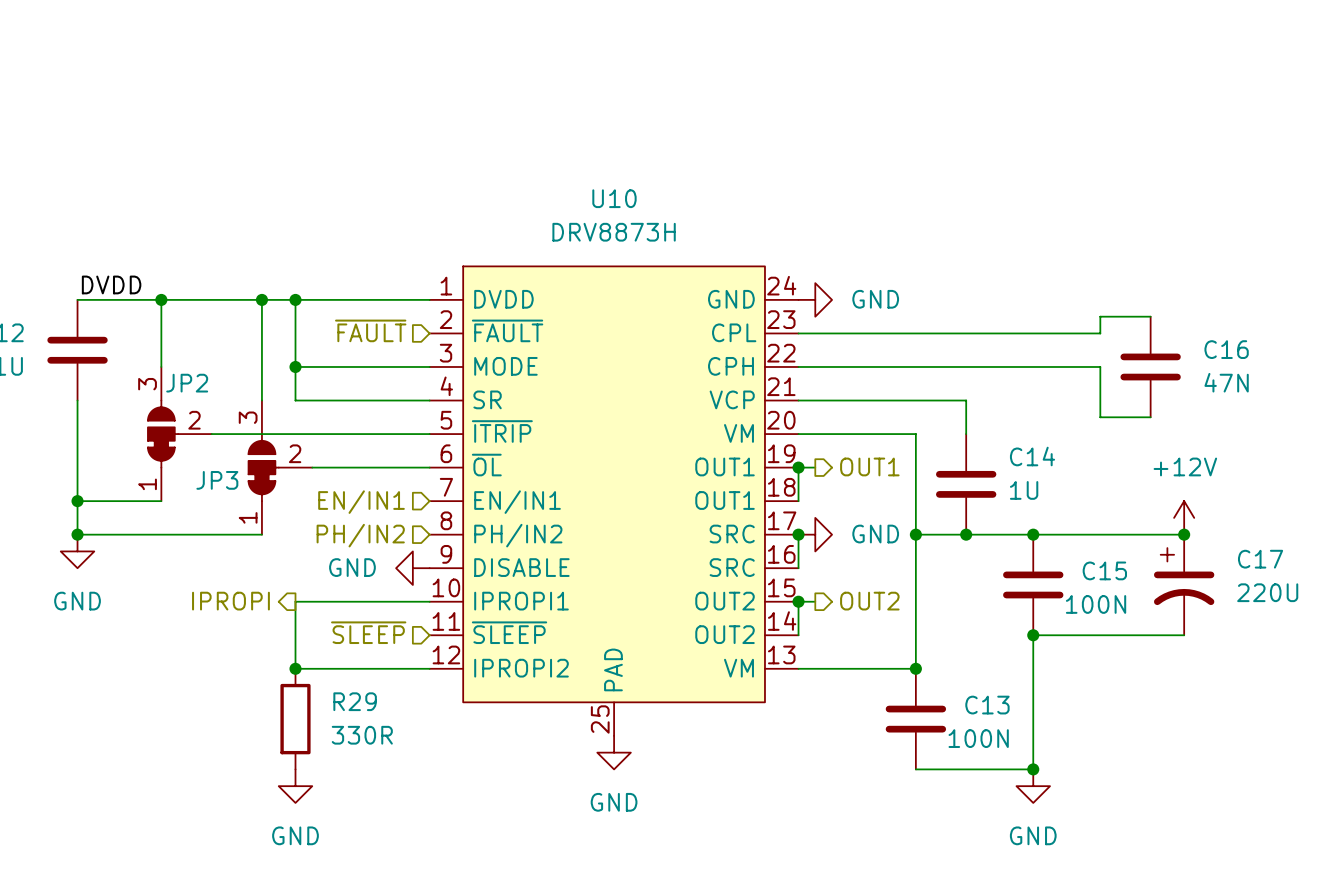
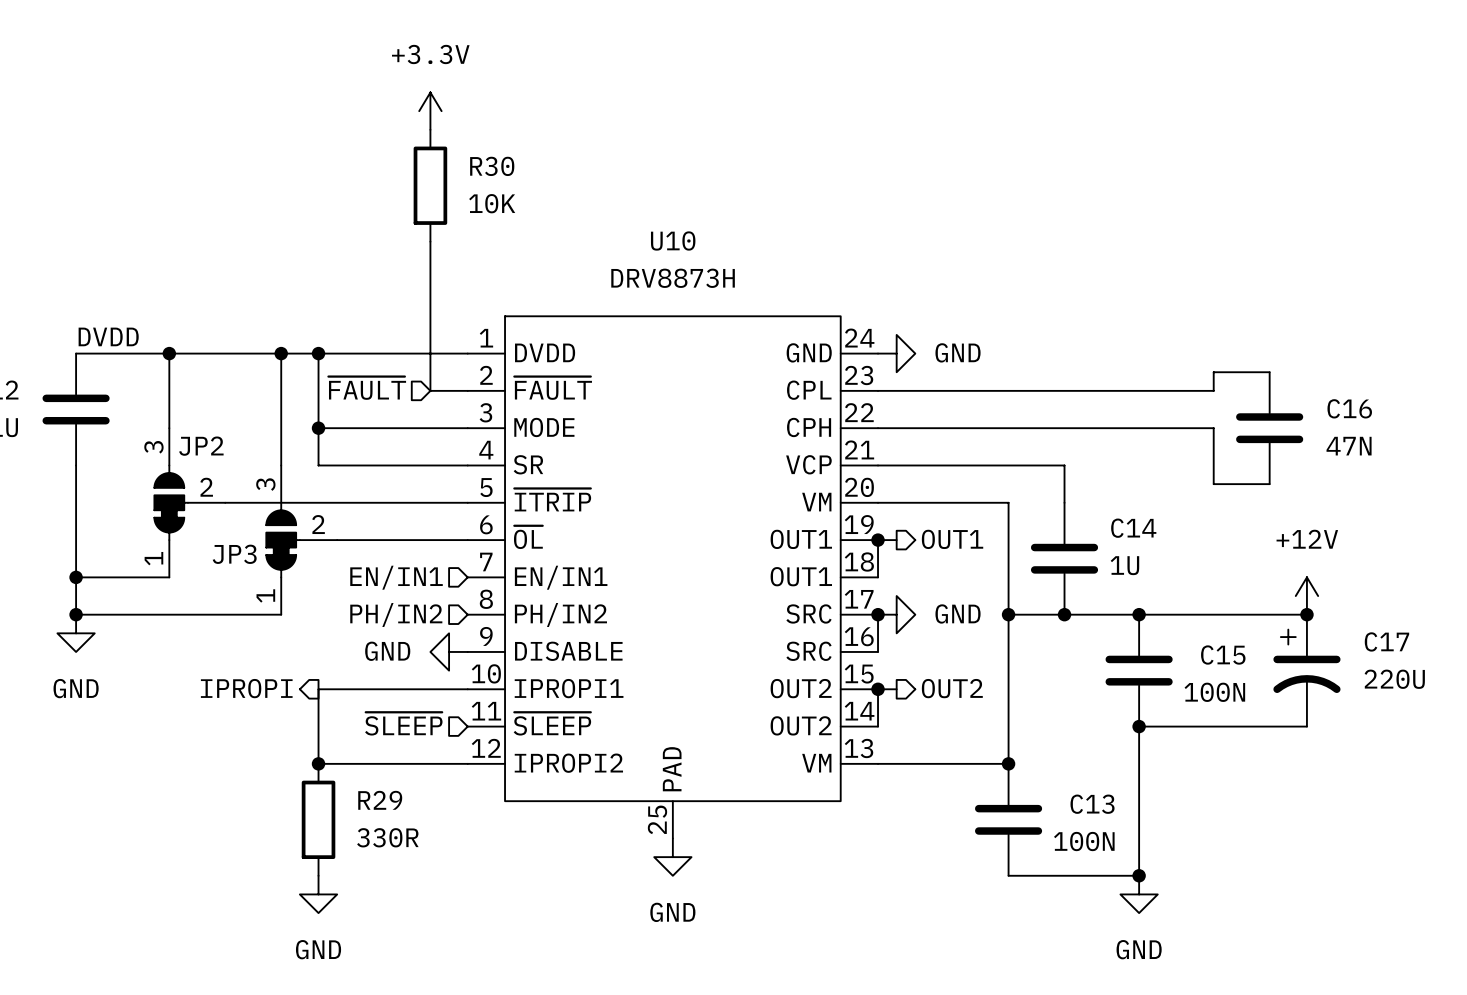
power symbol: none -> +3.3V (430, 111)
R30: none -> 10K (430, 185)
wire: none -> (430, 241) (430, 390) (467, 390)
hierarchical label position: ~{FAULT} (370, 330) -> ~{FAULT} (367, 388)

